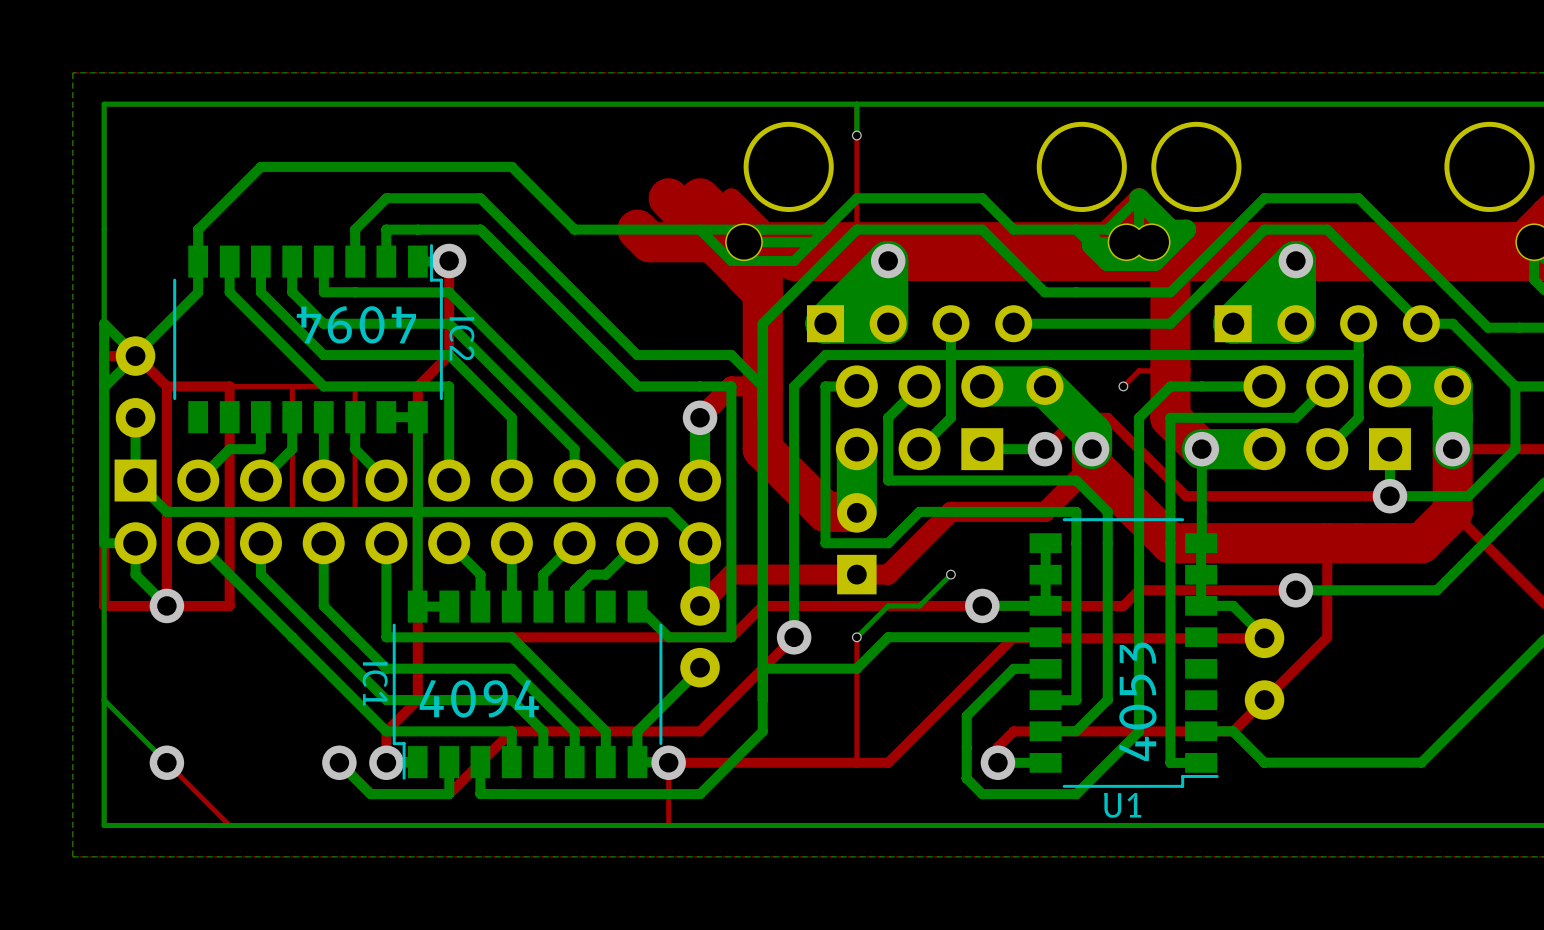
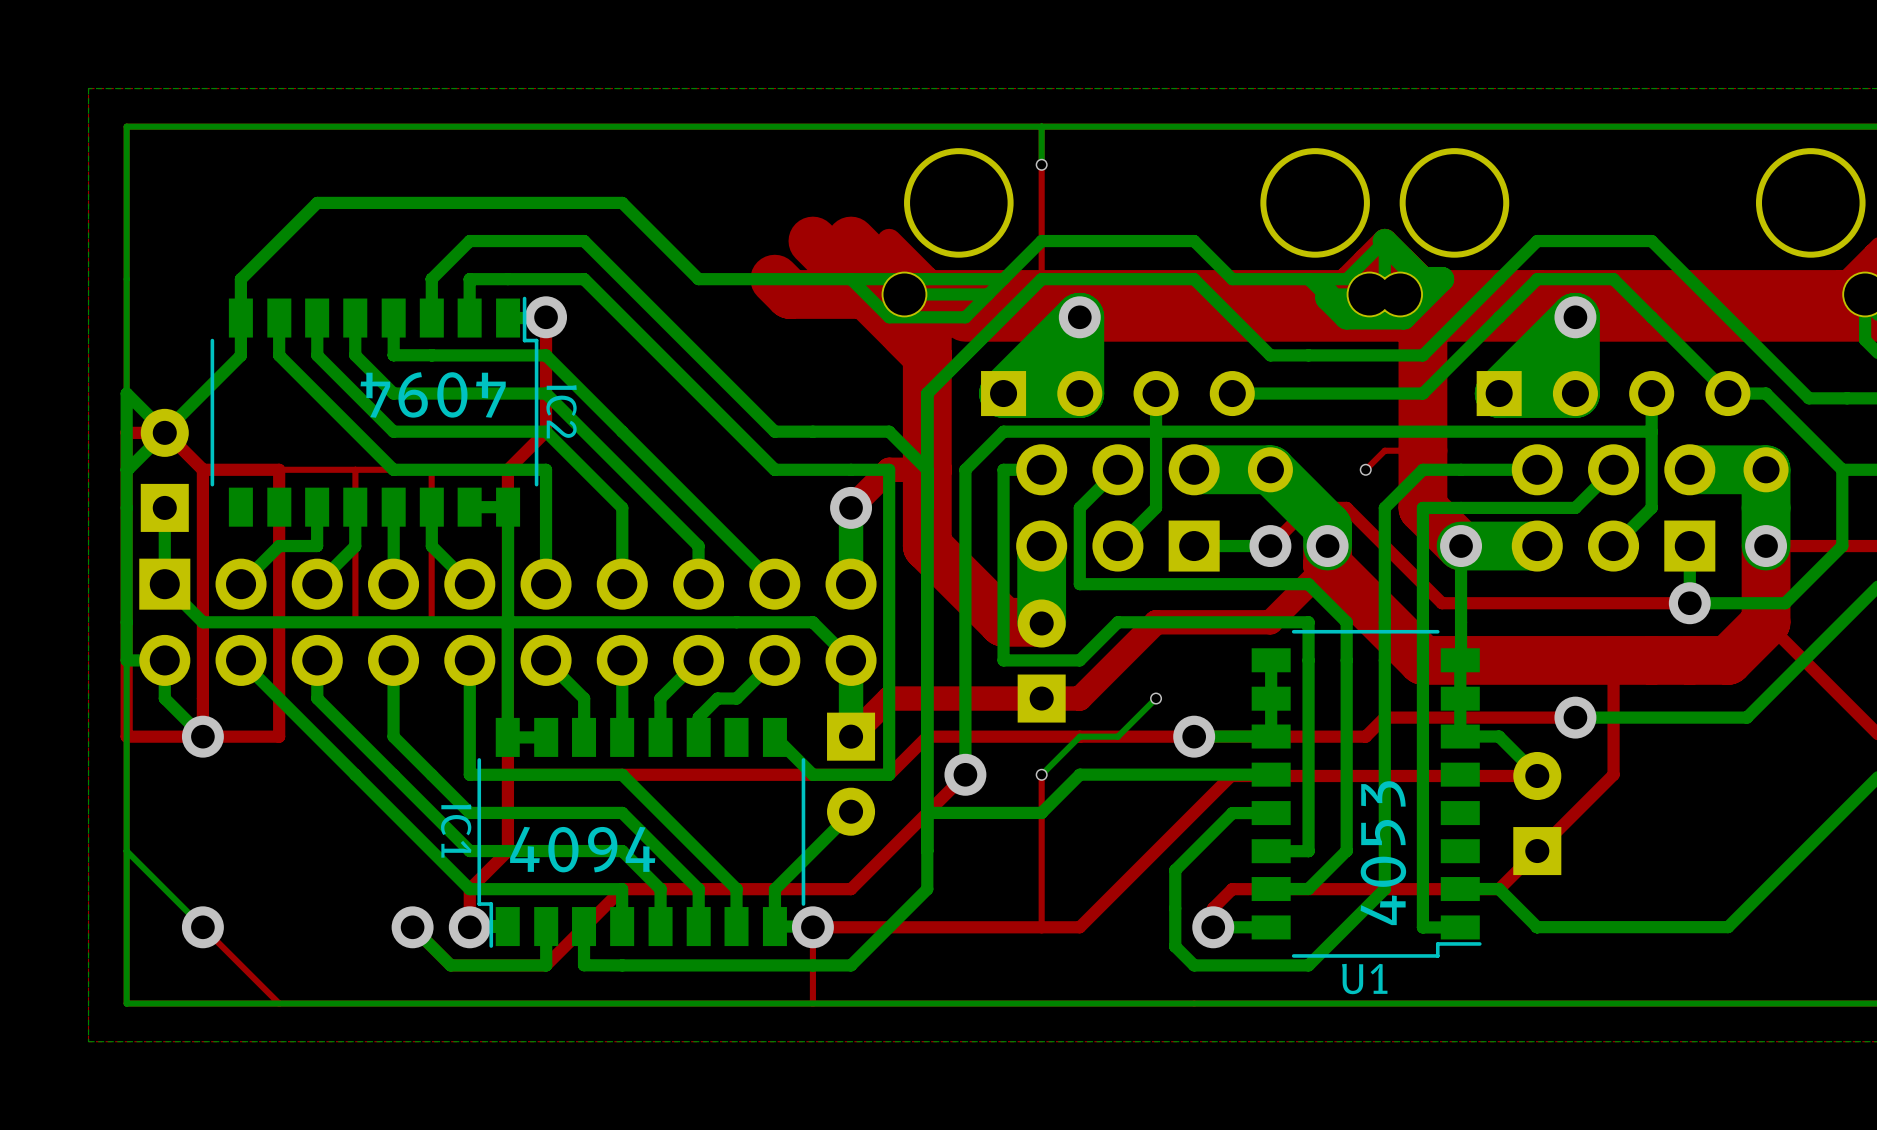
part footprint: [115, 336, 156, 438] -> [140, 408, 189, 532]
part footprint: [680, 586, 720, 688] -> [827, 712, 876, 836]
part footprint: [1244, 618, 1285, 720] -> [1513, 751, 1562, 876]

